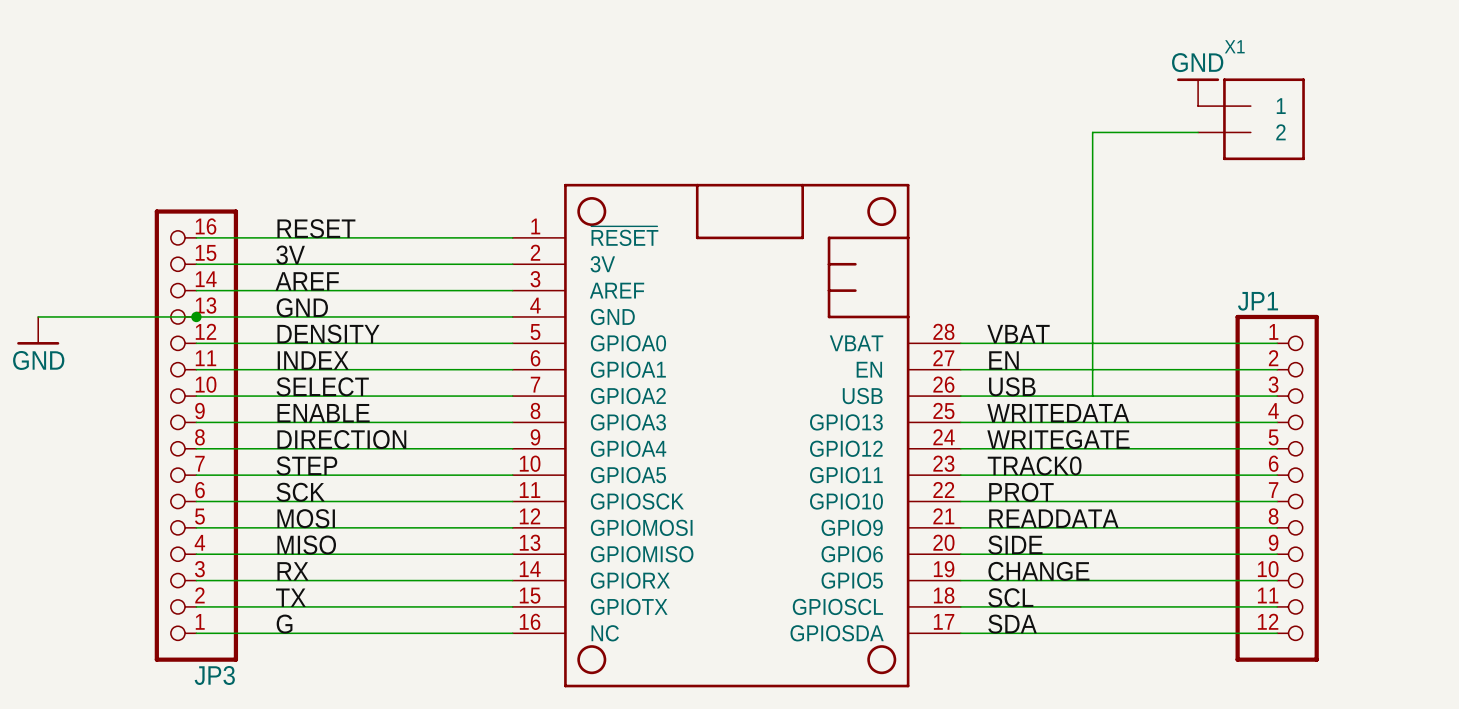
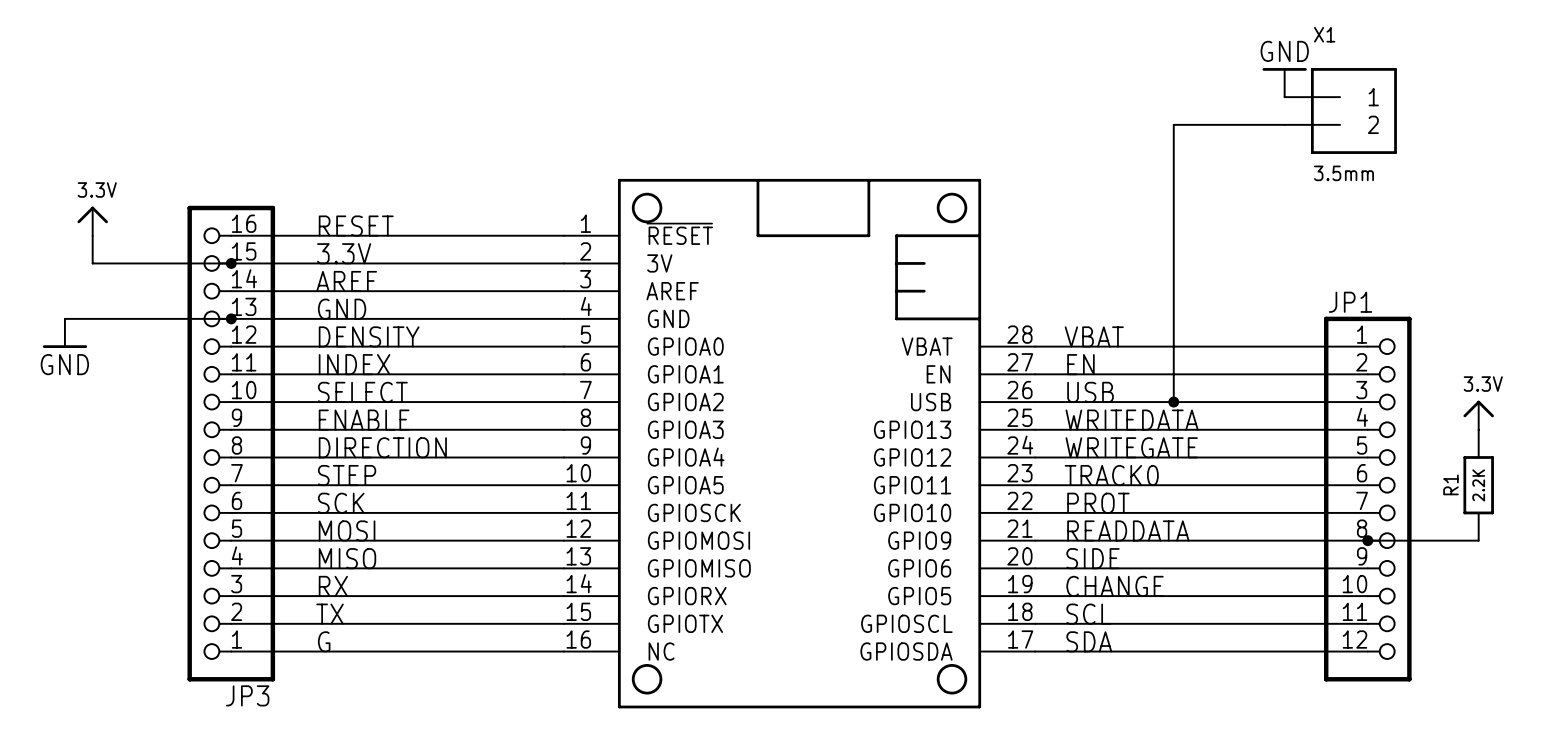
X1 value: none -> 3.5mm (1343, 173)
power symbol: none -> 3.3V (92, 221)
wire: none -> (92, 235) (92, 263) (231, 263)
label: 3V (290, 255) -> 3.3V (344, 253)
junction: none -> (231, 263)
junction: none -> (1173, 402)
power symbol: none -> 3.3V (1478, 415)
R1: none -> 2.2K (1478, 485)
wire: none -> (1367, 540) (1478, 540)
junction: none -> (1367, 540)

